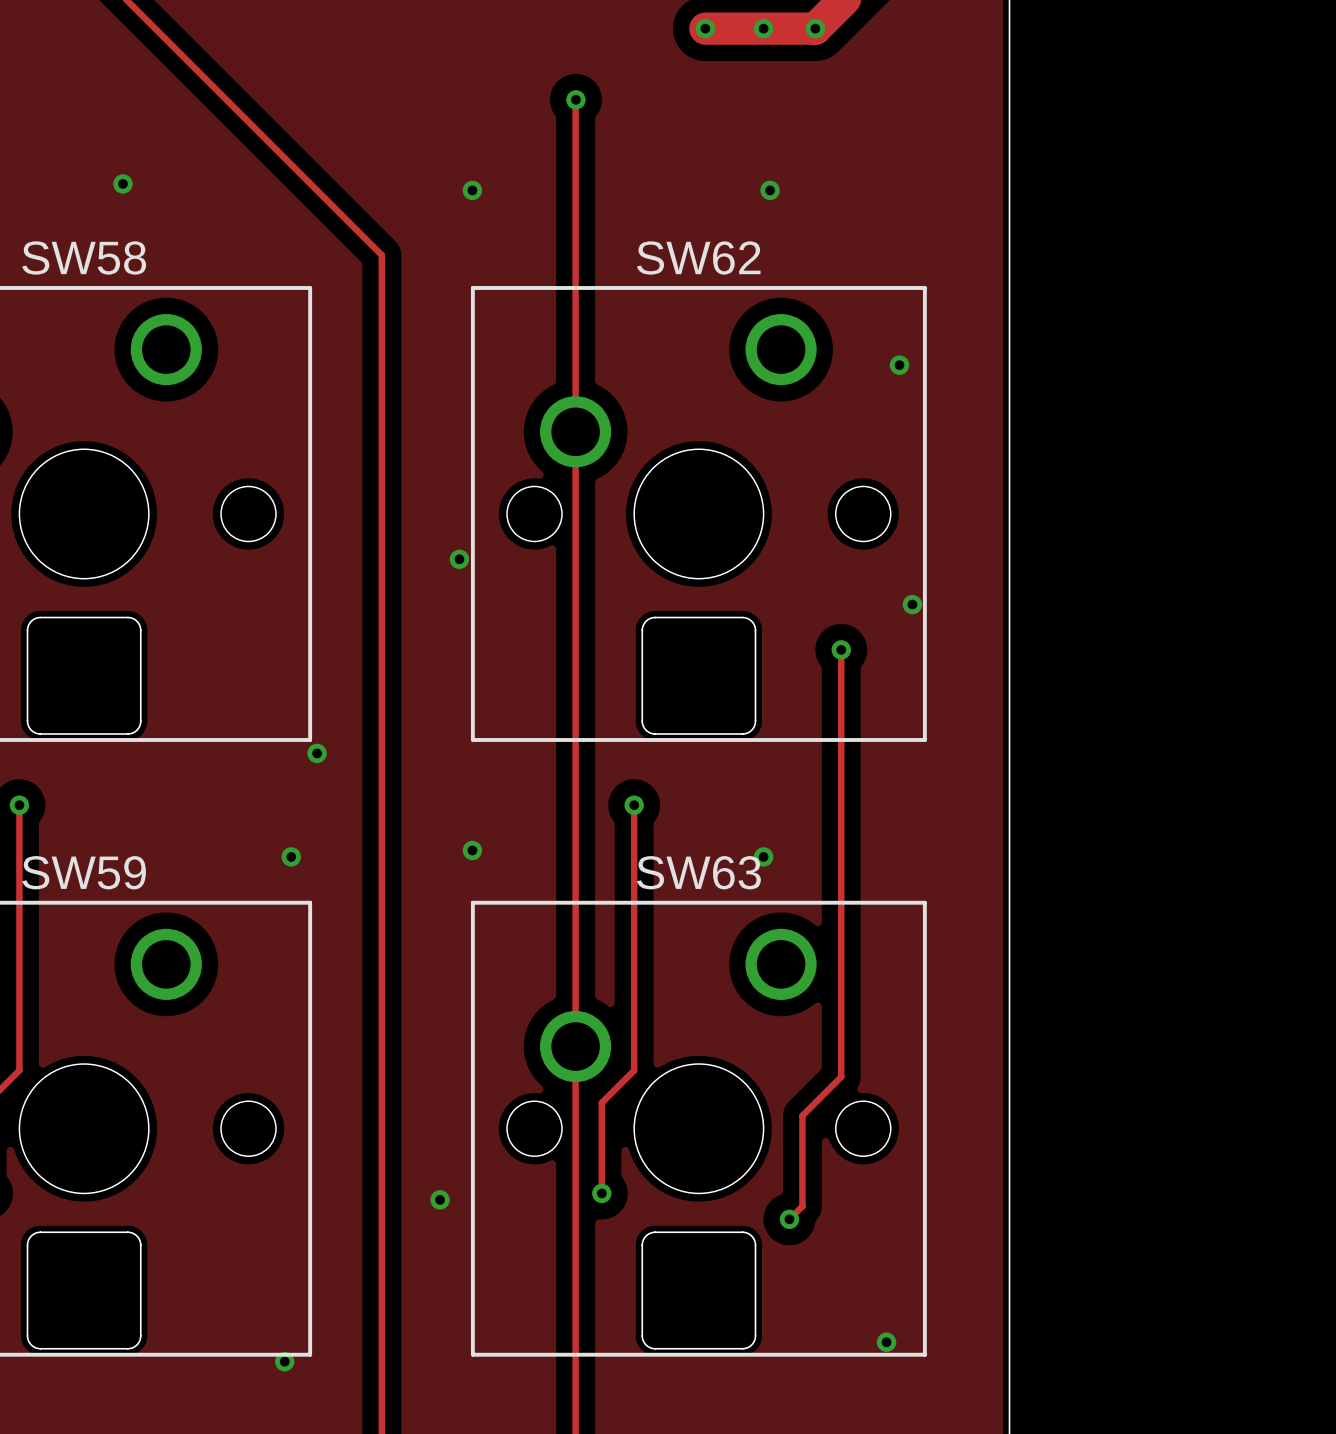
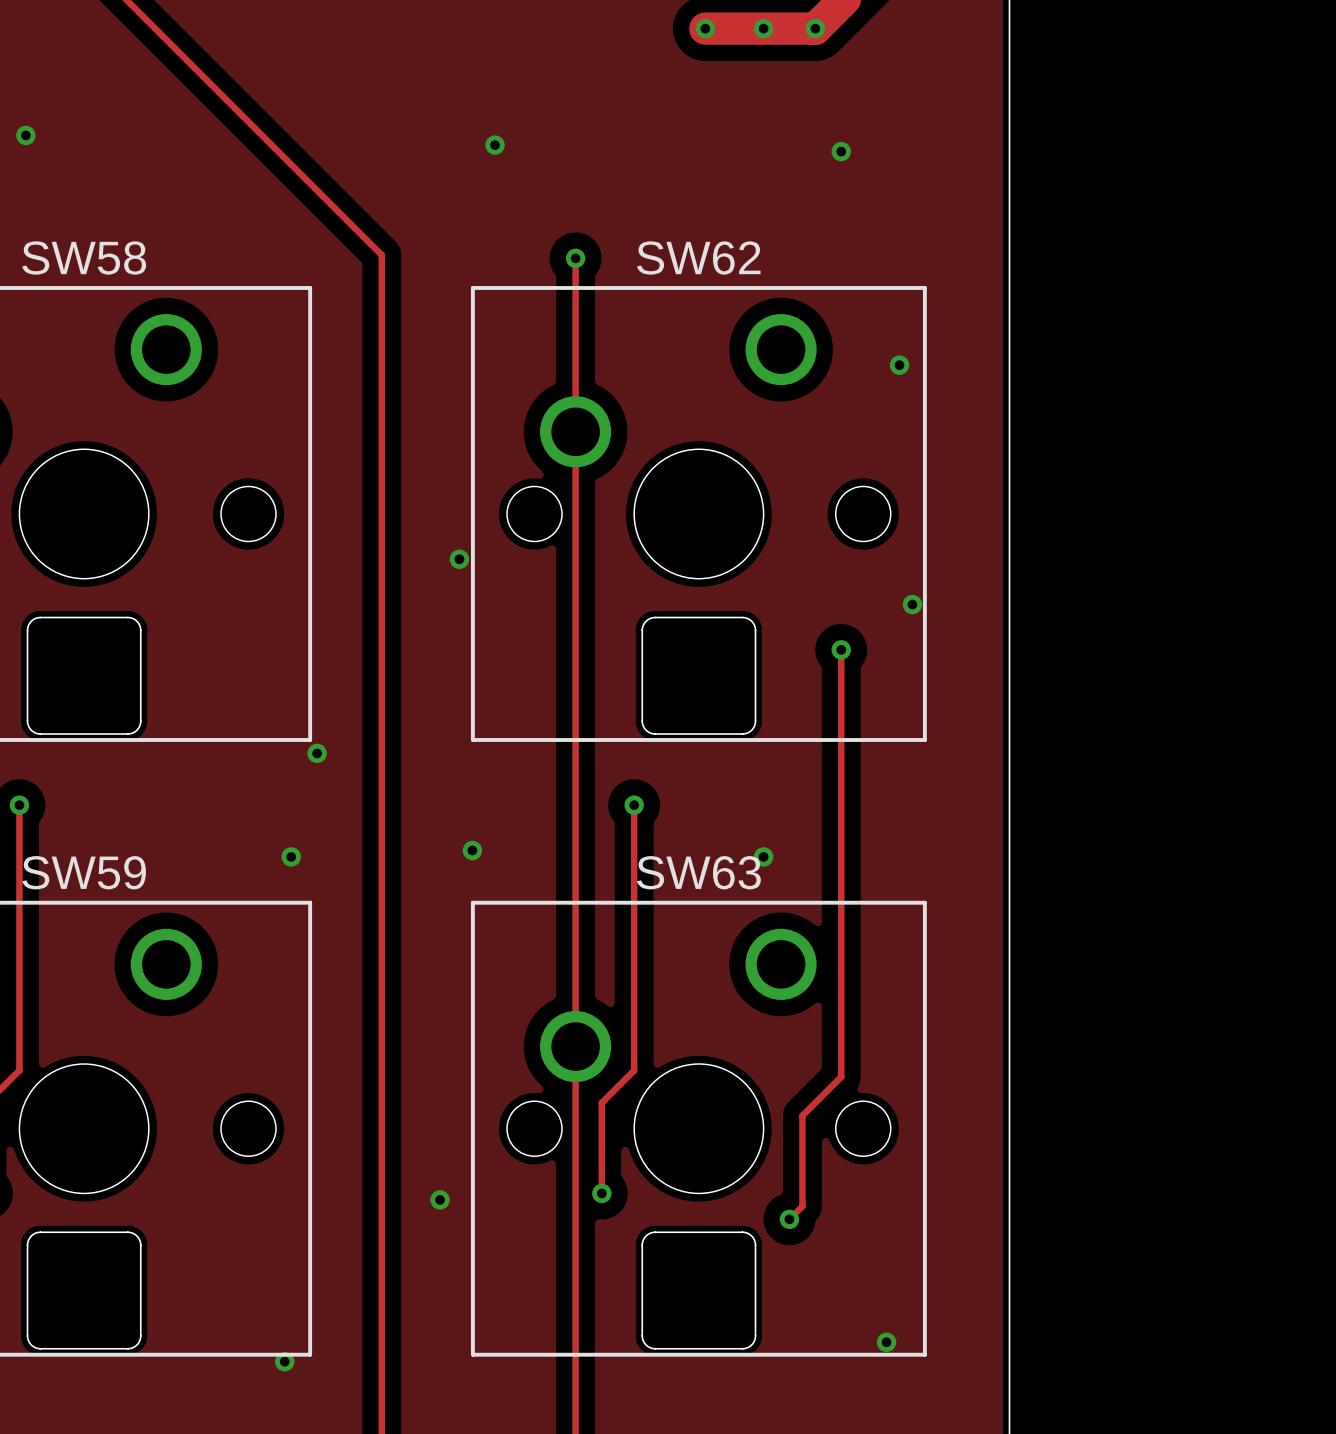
via: (575, 99) -> none
track: (575, 100) (575, 258) -> none
via: none -> (25, 135)
via: none -> (495, 145)
via: (122, 183) -> none
via: (472, 190) -> none
via position: (770, 190) -> (841, 151)
via: none -> (575, 258)

